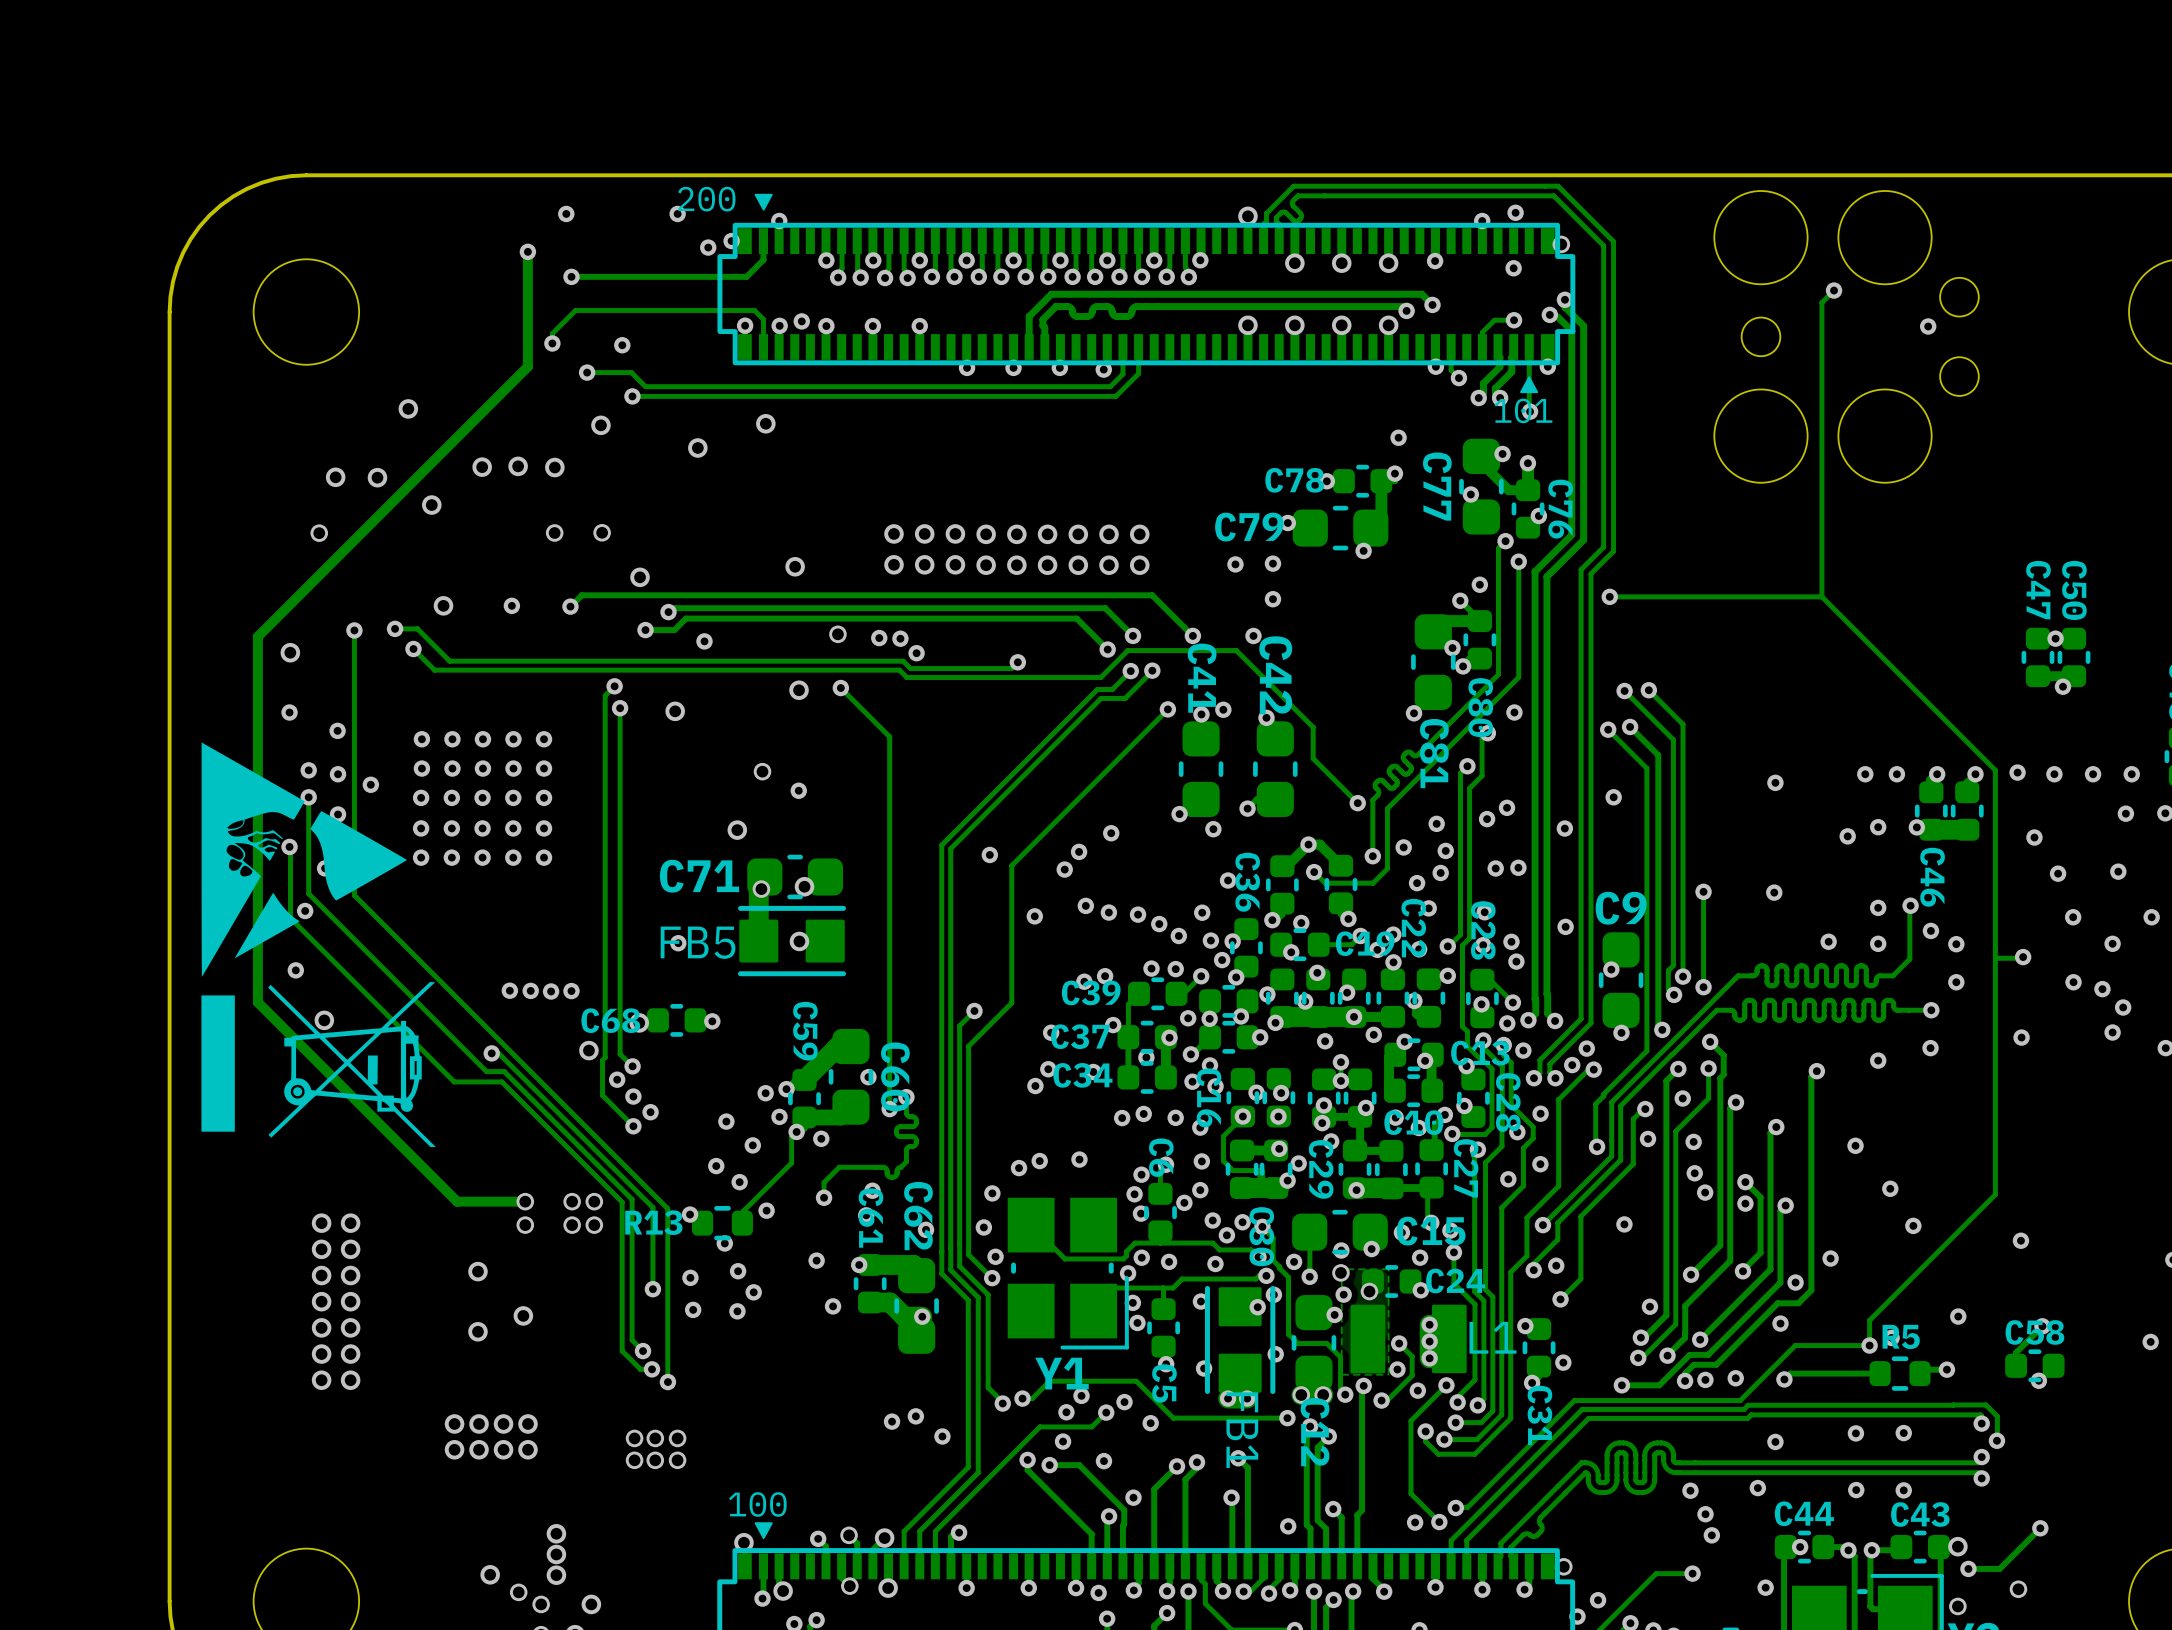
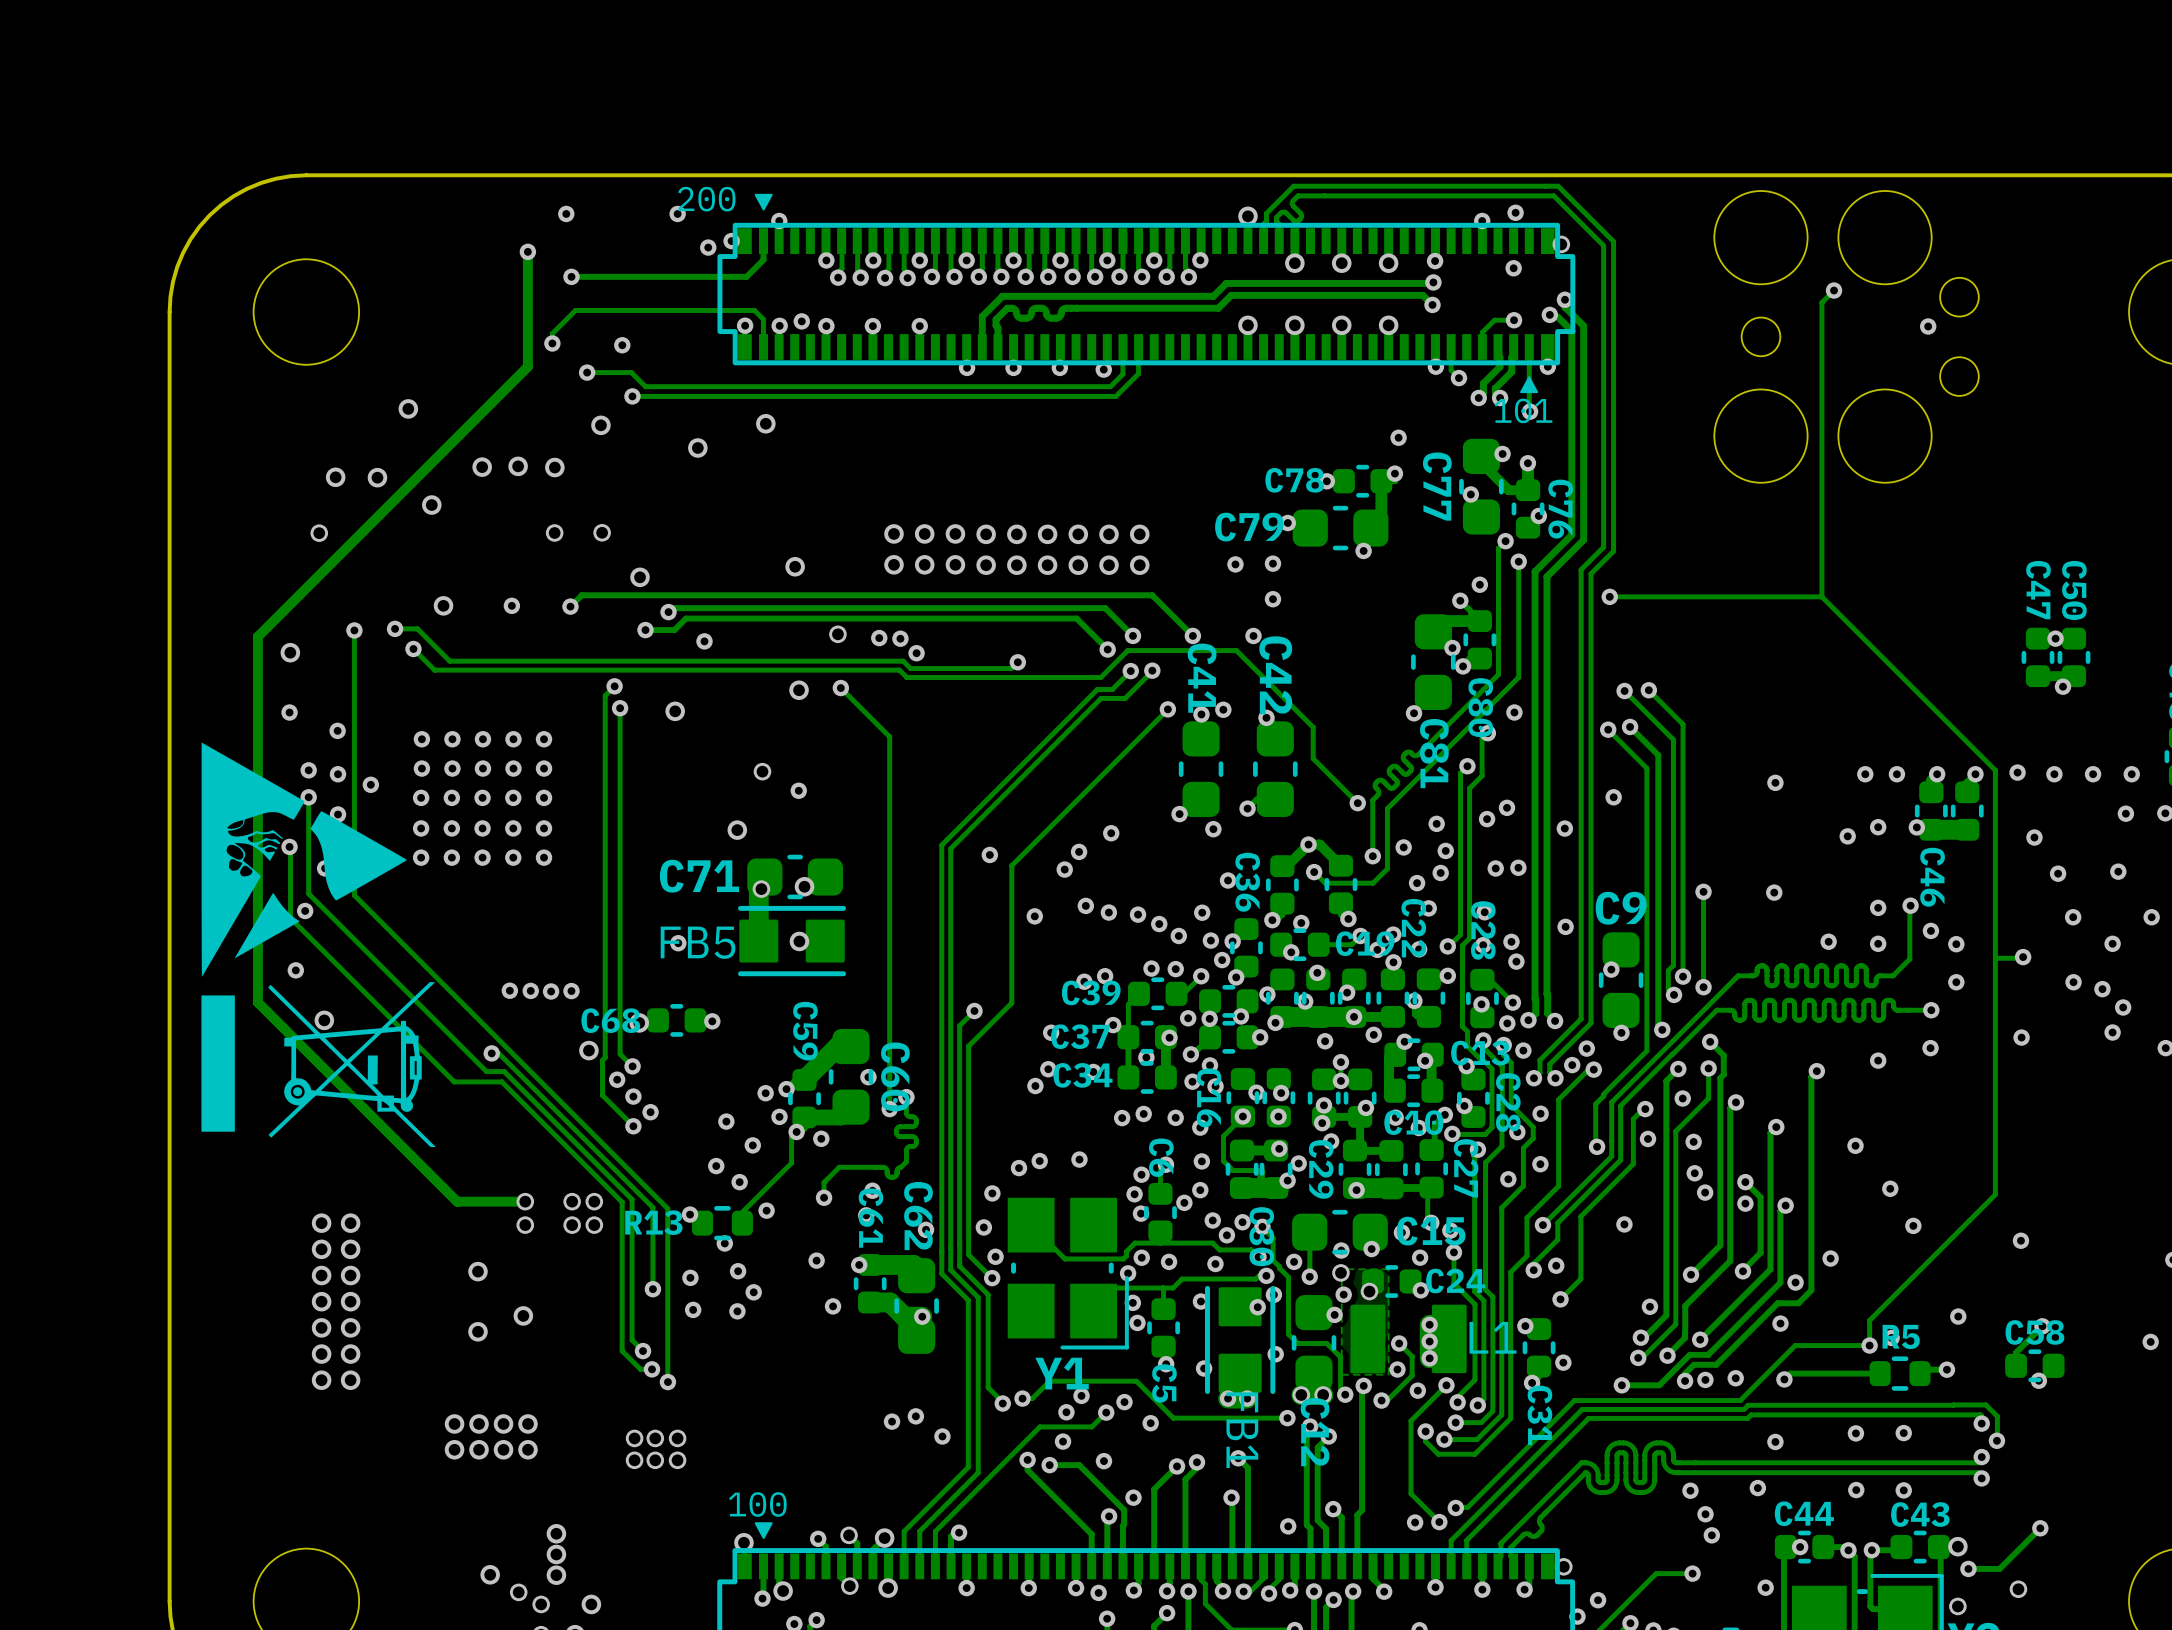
track: none -> (1433, 282) (1226, 283) (1213, 296) (1002, 296) (982, 316) (982, 346)
track: (1422, 295) (1051, 294) (1029, 316) (1029, 346) -> (1422, 295) (1231, 295) (1218, 308) (1065, 308) (1061, 310) (1059, 316) (1056, 318) (1048, 317) (1045, 310) (1041, 308) (1033, 309) (1028, 317) (1020, 318) (1014, 309) (1007, 308) (996, 319) (997, 346)
track: (1403, 306) (1136, 306) (1127, 316) (1114, 315) (1111, 308) (1107, 306) (1095, 306) (1089, 315) (1077, 316) (1073, 314) (1069, 307) (1055, 306) (1042, 319) (1044, 346) -> none
via position: (1406, 310) -> (1433, 282)

